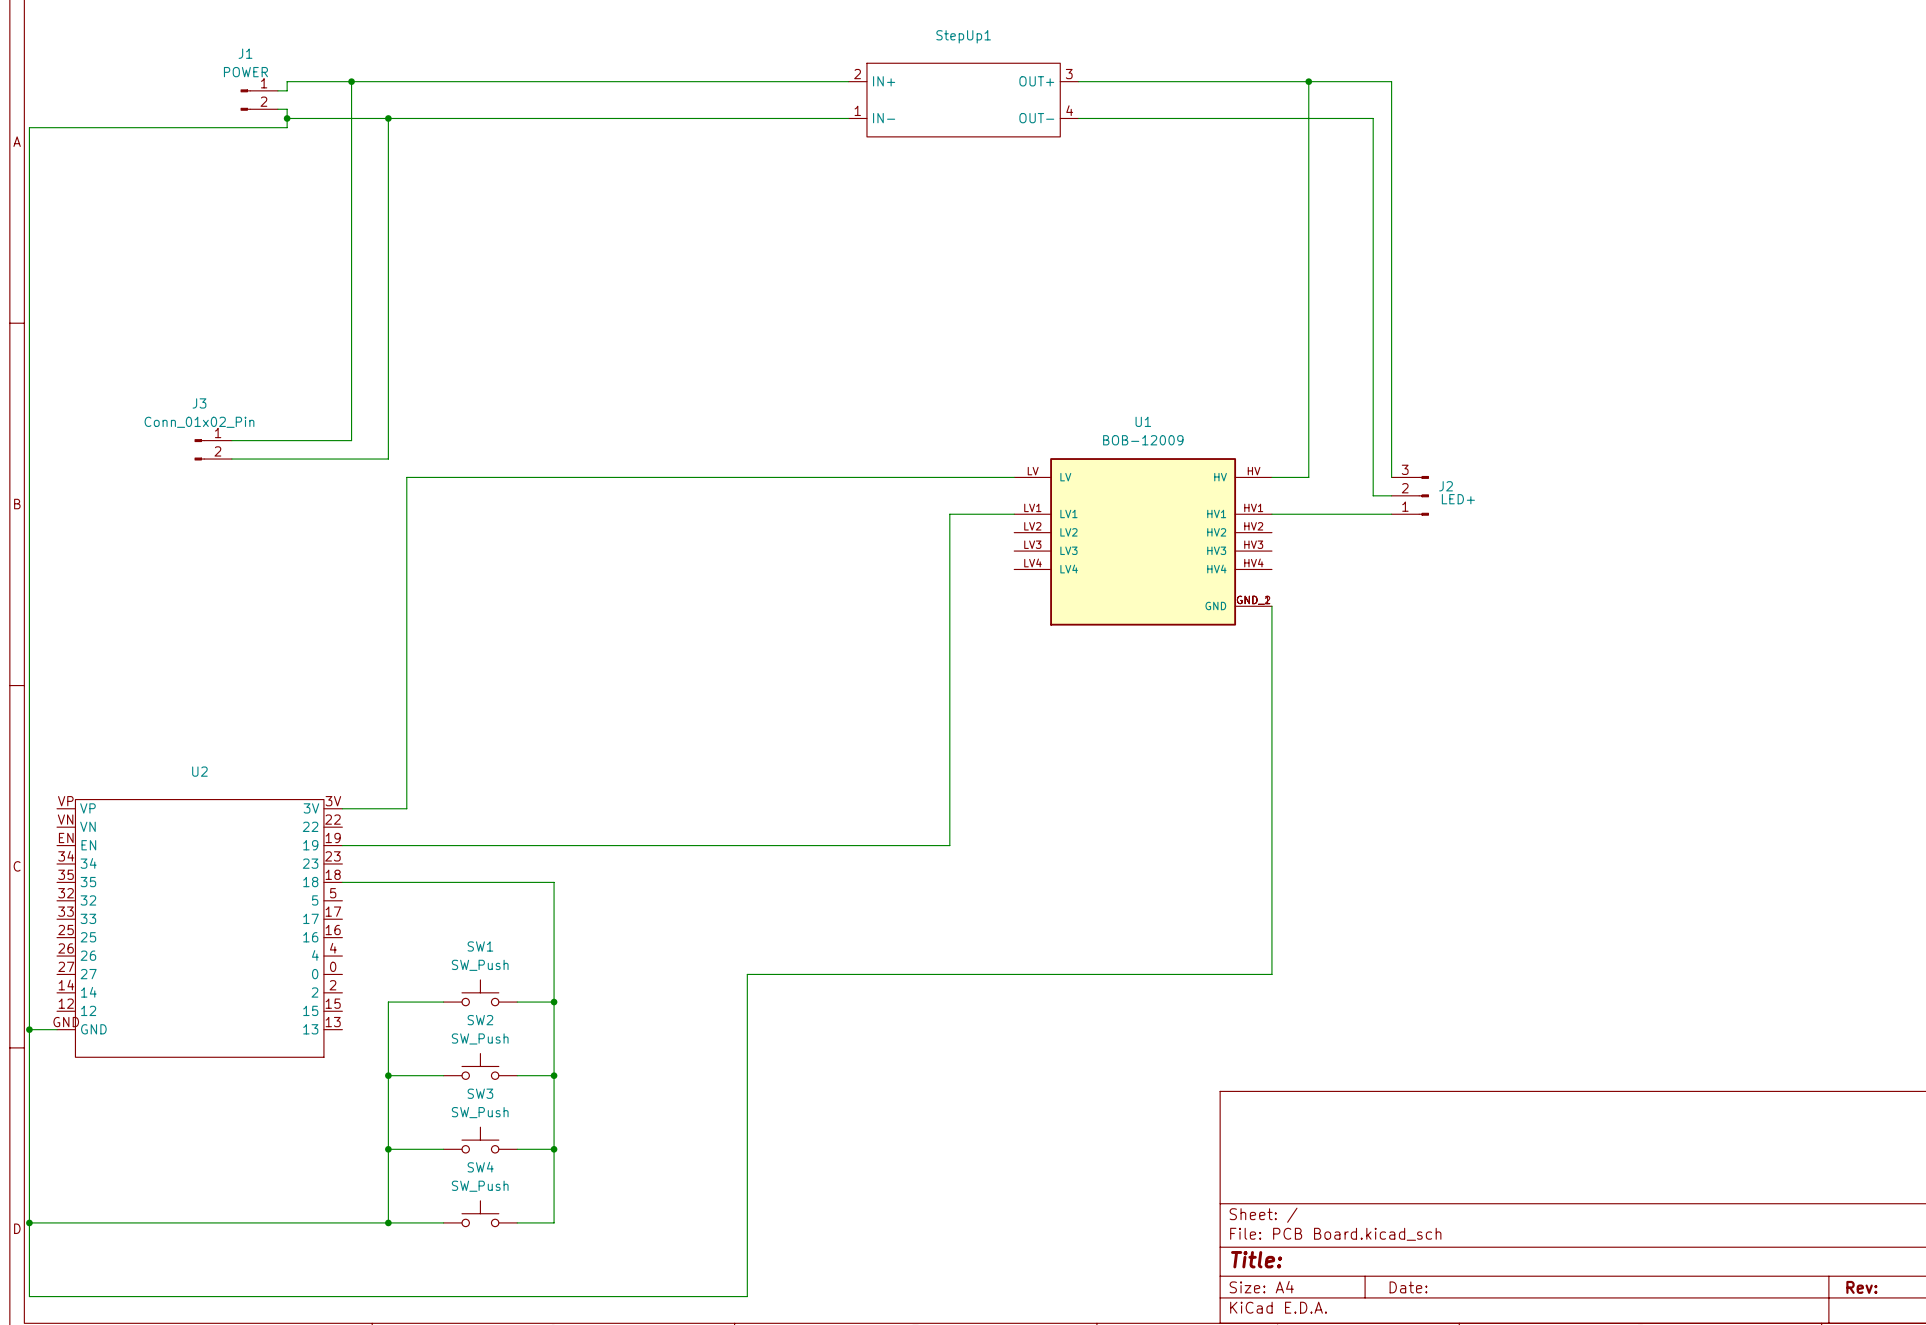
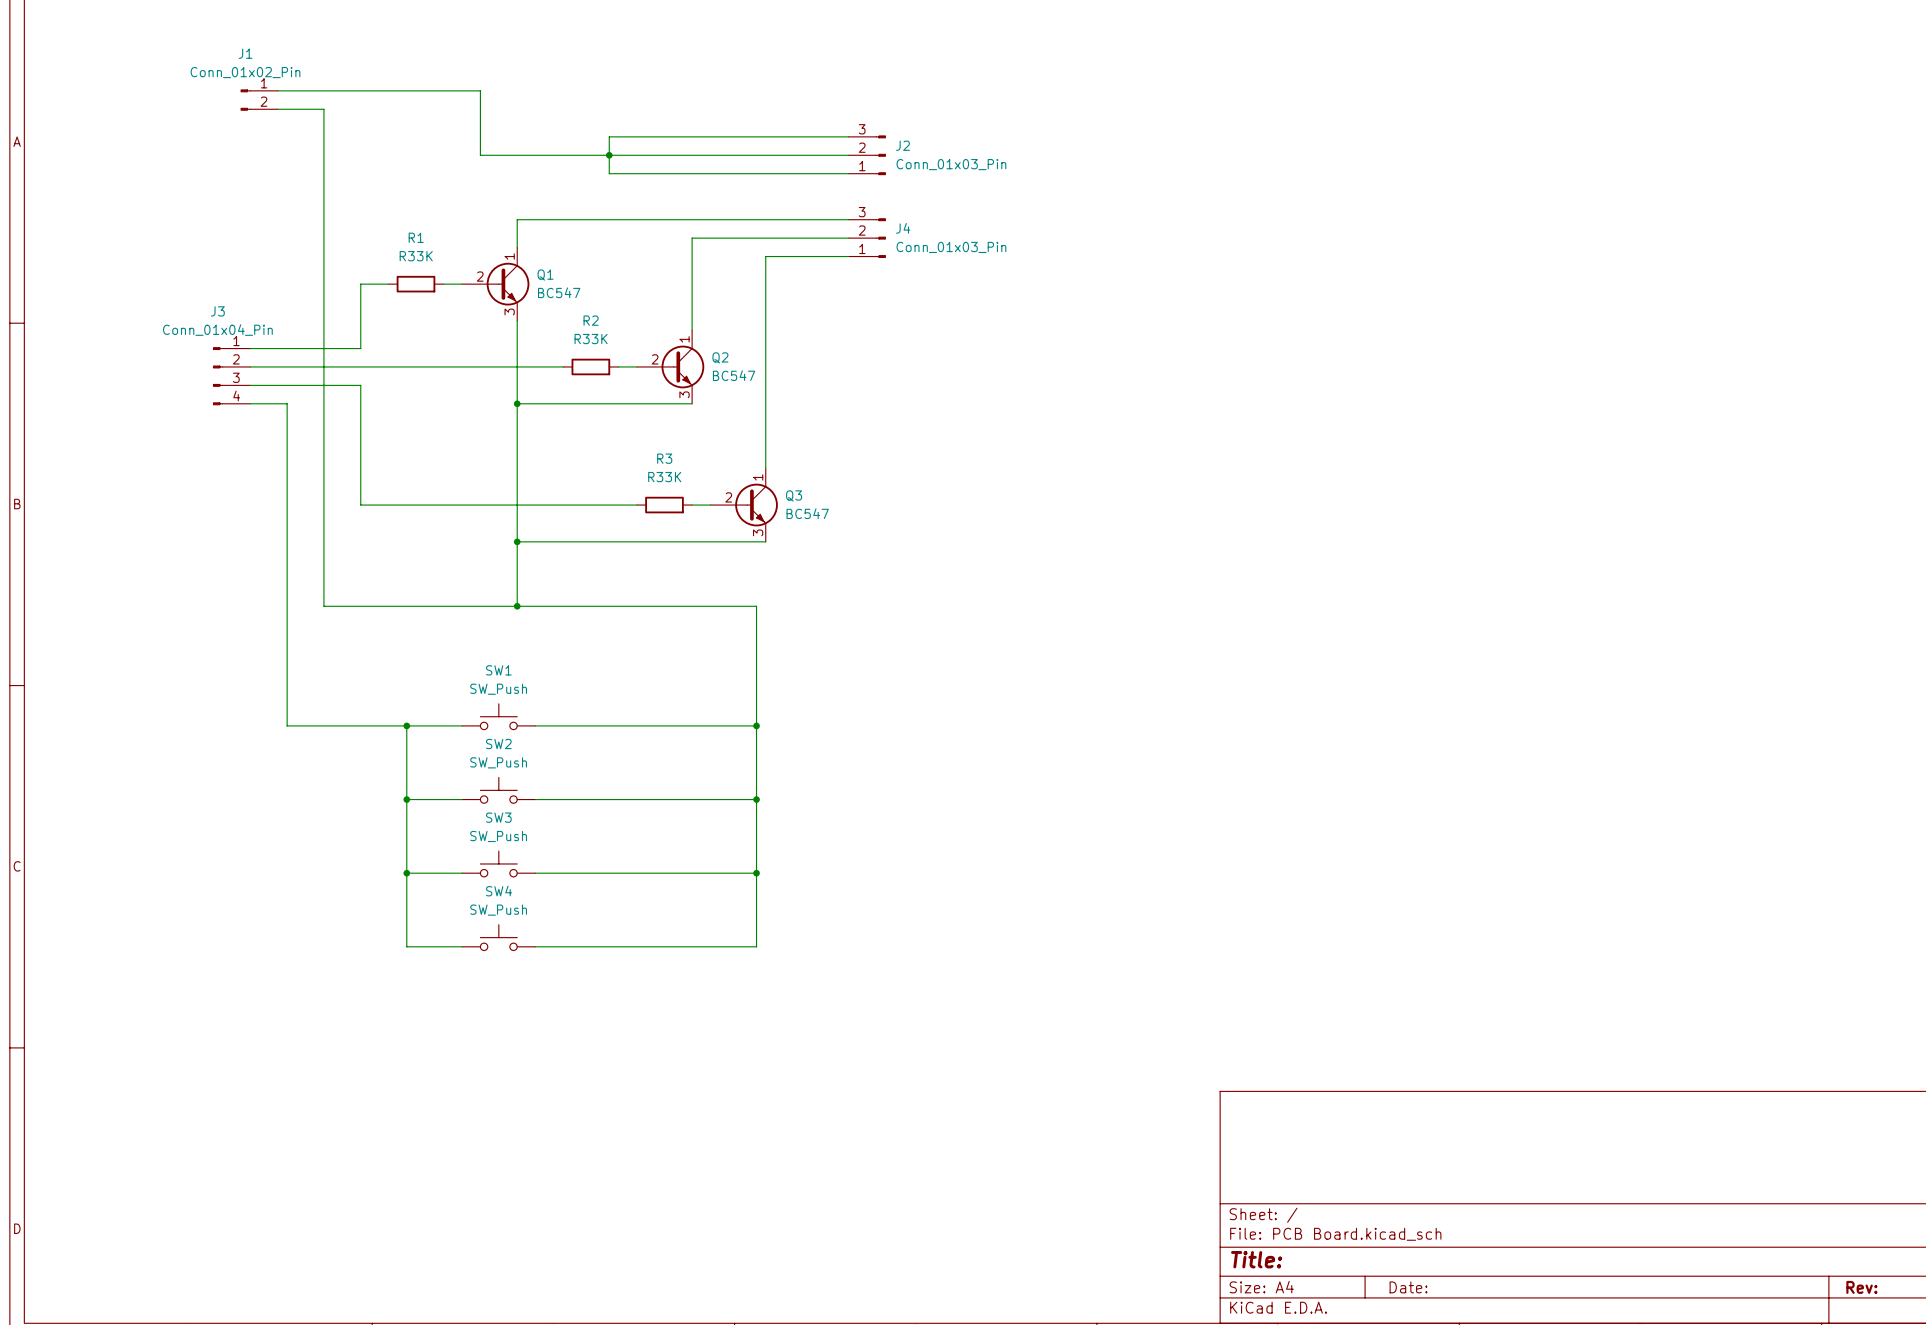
J1 value: POWER (245, 72) -> Conn_01x02_Pin (245, 72)
wire: (351, 81) (351, 440) (231, 440) -> none
junction: (351, 81) -> none
wire: (848, 81) (287, 81) (287, 90) -> (848, 155) (480, 155) (480, 90) (287, 90)
wire: (1078, 81) (1391, 81) (1391, 477) -> none
wire: (1308, 81) (1308, 477) (1271, 477) -> none
junction: (1308, 81) -> none
StepUp1: (963, 100) -> none
wire: (287, 109) (287, 127) (29, 127) (29, 1296) (747, 1296) (747, 974) (1271, 974) (1271, 606) -> (287, 109) (323, 109) (323, 606) (756, 606) (756, 946) (535, 946)
wire: (287, 118) (848, 118) -> none
junction: (287, 118) -> none
wire: (388, 118) (388, 459) (231, 459) -> none
junction: (388, 118) -> none
wire: (1078, 118) (1373, 118) (1373, 495) (1391, 495) -> none
wire: none -> (848, 136) (609, 136) (609, 173) (848, 173)
junction: none -> (609, 155)
wire: none -> (848, 219) (517, 219) (517, 247)
wire: none -> (848, 238) (692, 238) (692, 330)
J4: none -> Conn_01x03_Pin (867, 238)
wire: none -> (848, 256) (765, 256) (765, 468)
wire: none -> (388, 284) (360, 284) (360, 348) (250, 348)
R1: none -> R33K (415, 284)
wire: none -> (443, 284) (462, 284)
Q1: none -> BC547 (495, 284)
wire: none -> (517, 320) (517, 606)
wire: none -> (250, 366) (563, 366)
R2: none -> R33K (590, 366)
wire: none -> (618, 366) (636, 366)
Q2: none -> BC547 (670, 366)
wire: none -> (250, 385) (360, 385) (360, 505) (636, 505)
J3 name position: J3 (199, 403) -> J3 (217, 311)
wire: none -> (250, 403) (287, 403) (287, 725) (462, 725)
wire: none -> (517, 403) (692, 403)
junction: none -> (517, 403)
J3 value: Conn_01x02_Pin (199, 422) -> Conn_01x04_Pin (217, 330)
J3 symbol: [194, 439, 232, 461] -> [212, 347, 251, 406]
wire: (1014, 477) (406, 477) (406, 725) -> none
J2 position: (1410, 495) -> (867, 155)
J2 value: LED+ (1458, 499) -> Conn_01x03_Pin (951, 164)
R3: none -> R33K (664, 505)
wire: none -> (692, 505) (710, 505)
Q3: none -> BC547 (744, 505)
wire: (1014, 514) (949, 514) (949, 845) (342, 845) -> none
wire: (1271, 514) (1391, 514) -> none
wire: none -> (517, 541) (765, 541)
junction: none -> (517, 541)
U1: BOB-12009 (1143, 541) -> none
junction: none -> (517, 606)
junction: none -> (406, 725)
wire: none -> (535, 725) (756, 725)
junction: none -> (756, 725)
wire: none -> (406, 799) (462, 799)
junction: none -> (406, 799)
wire: none -> (535, 799) (756, 799)
junction: none -> (756, 799)
wire: (342, 808) (406, 808) -> (462, 946) (406, 946) (406, 808)
wire: none -> (406, 873) (462, 873)
junction: none -> (406, 873)
wire: none -> (535, 873) (756, 873)
junction: none -> (756, 873)
wire: (342, 882) (554, 882) (554, 1222) (517, 1222) -> none
U2: (199, 928) -> none
SW1 position: (480, 992) -> (498, 716)
wire: (443, 1002) (388, 1002) (388, 1222) -> none
wire: (517, 1002) (554, 1002) -> none
junction: (554, 1002) -> none
wire: (29, 1029) (57, 1029) -> none
junction: (29, 1029) -> none
SW2 position: (480, 1066) -> (498, 790)
wire: (388, 1075) (443, 1075) -> none
junction: (388, 1075) -> none
wire: (517, 1075) (554, 1075) -> none
junction: (554, 1075) -> none
SW3 position: (480, 1140) -> (498, 863)
wire: (388, 1149) (443, 1149) -> none
junction: (388, 1149) -> none
wire: (517, 1149) (554, 1149) -> none
junction: (554, 1149) -> none
SW4 position: (480, 1213) -> (498, 937)
wire: (29, 1222) (443, 1222) -> none
junction: (29, 1222) -> none
junction: (388, 1222) -> none

